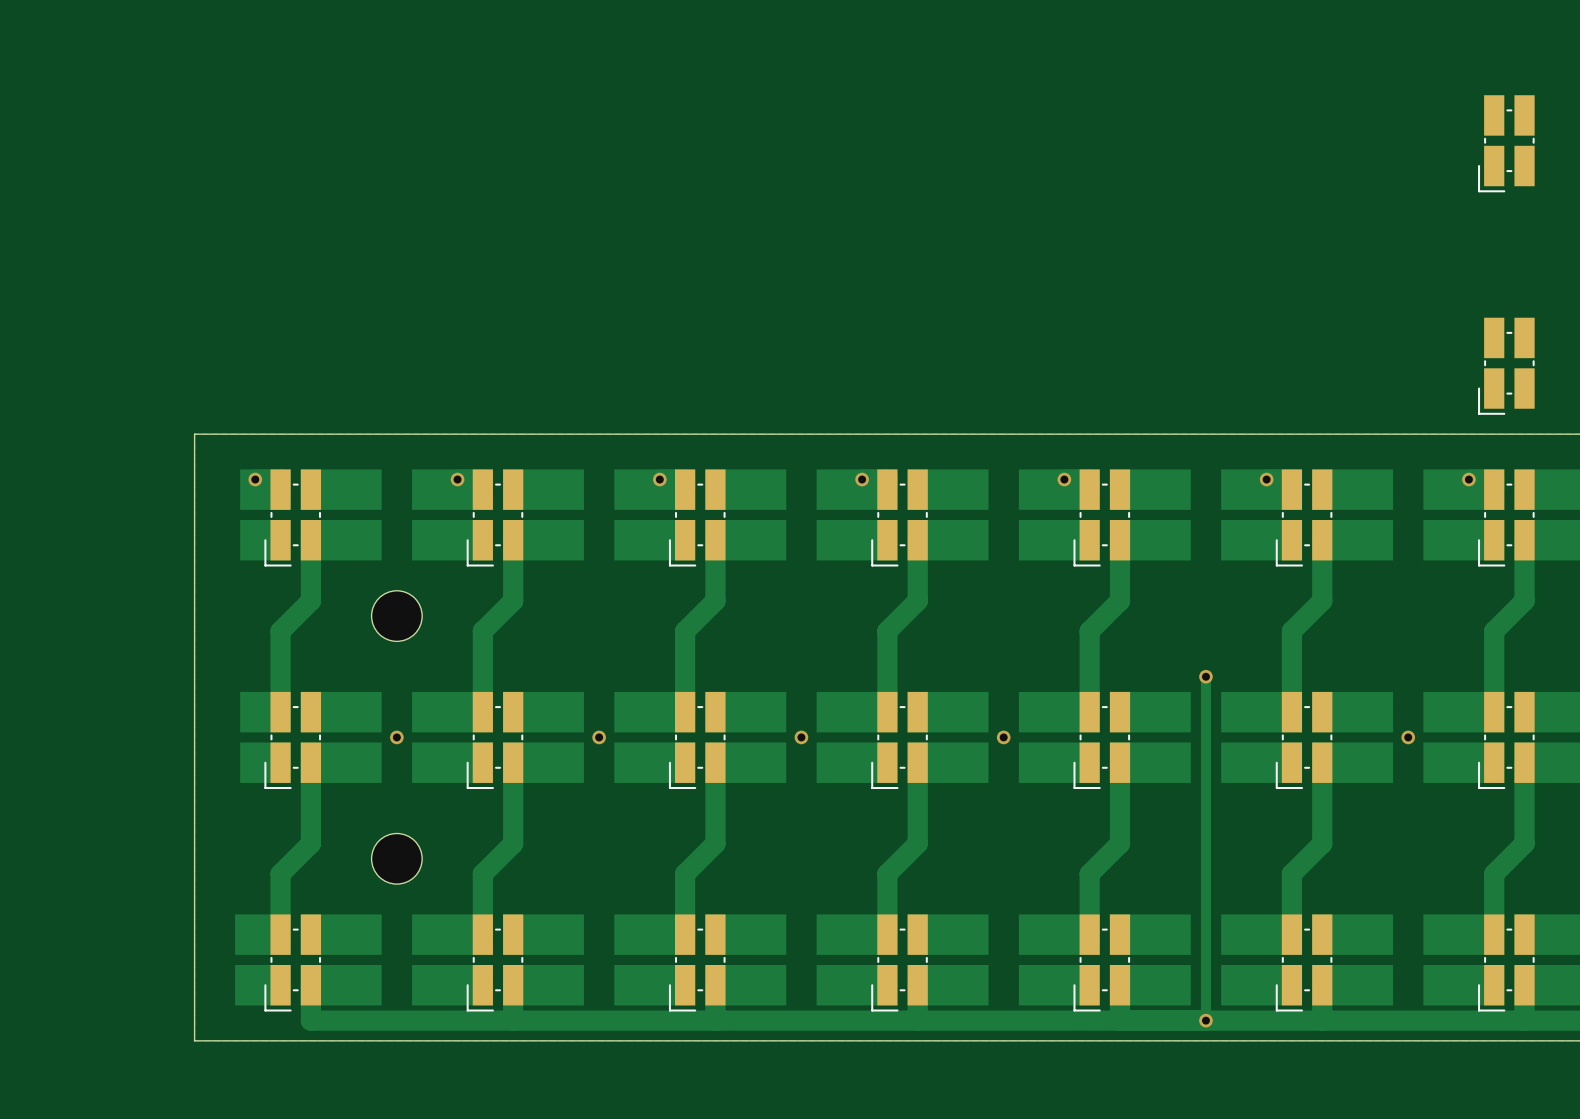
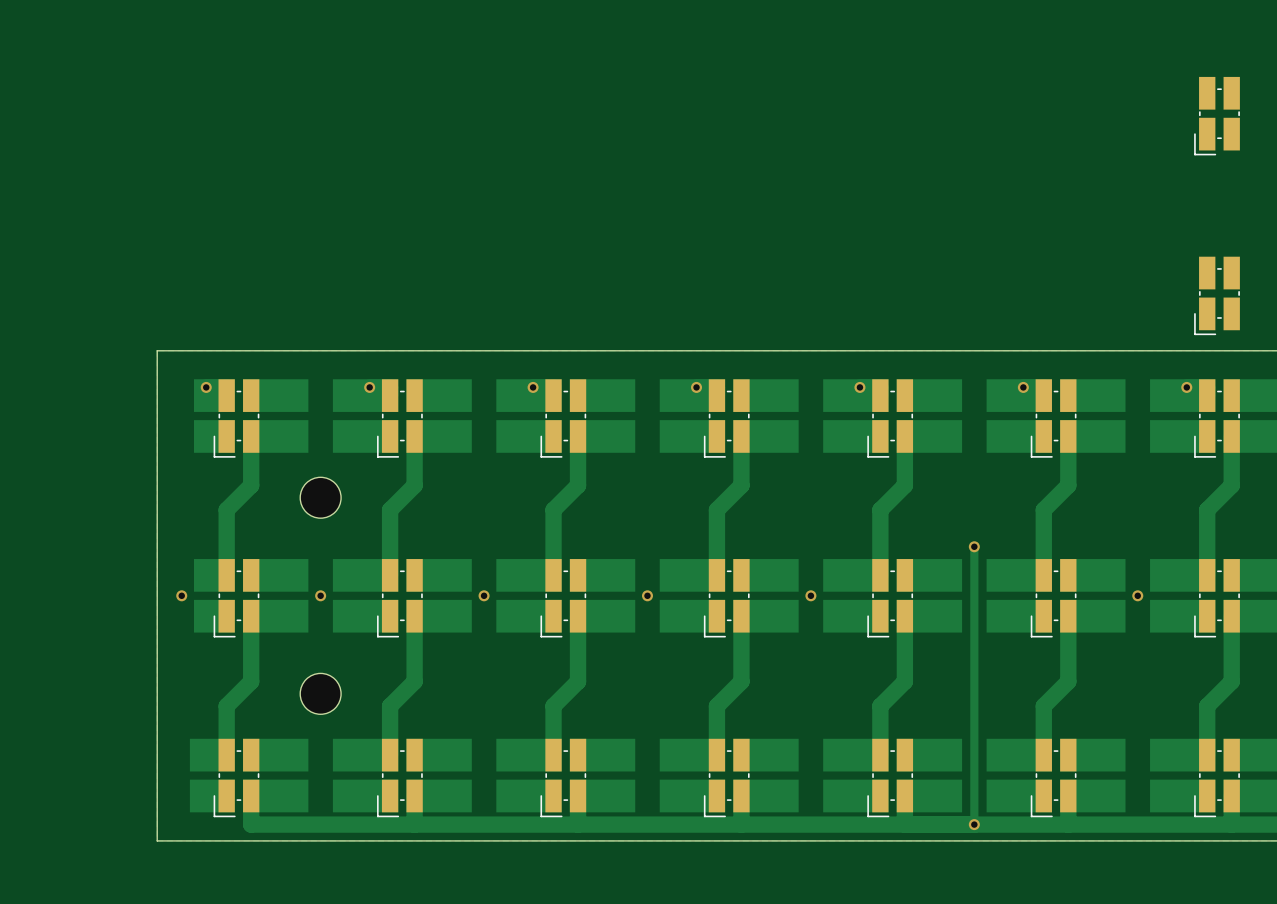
via: none -> (181, 595)

